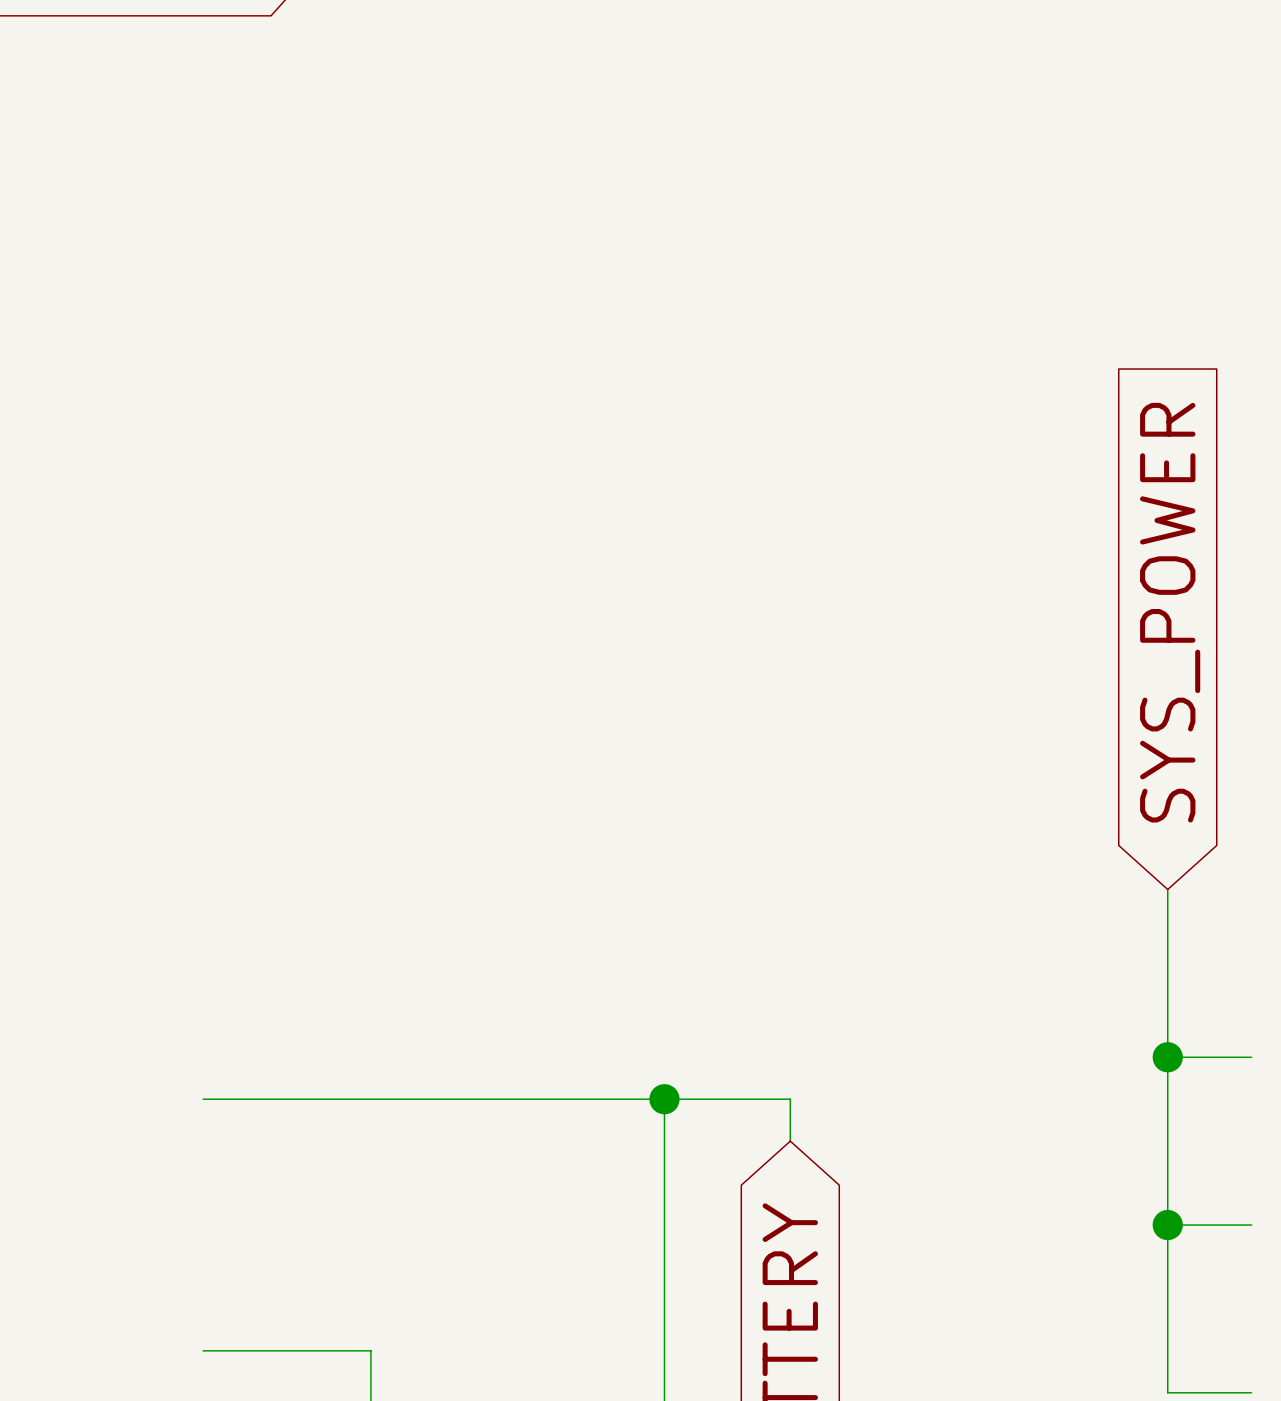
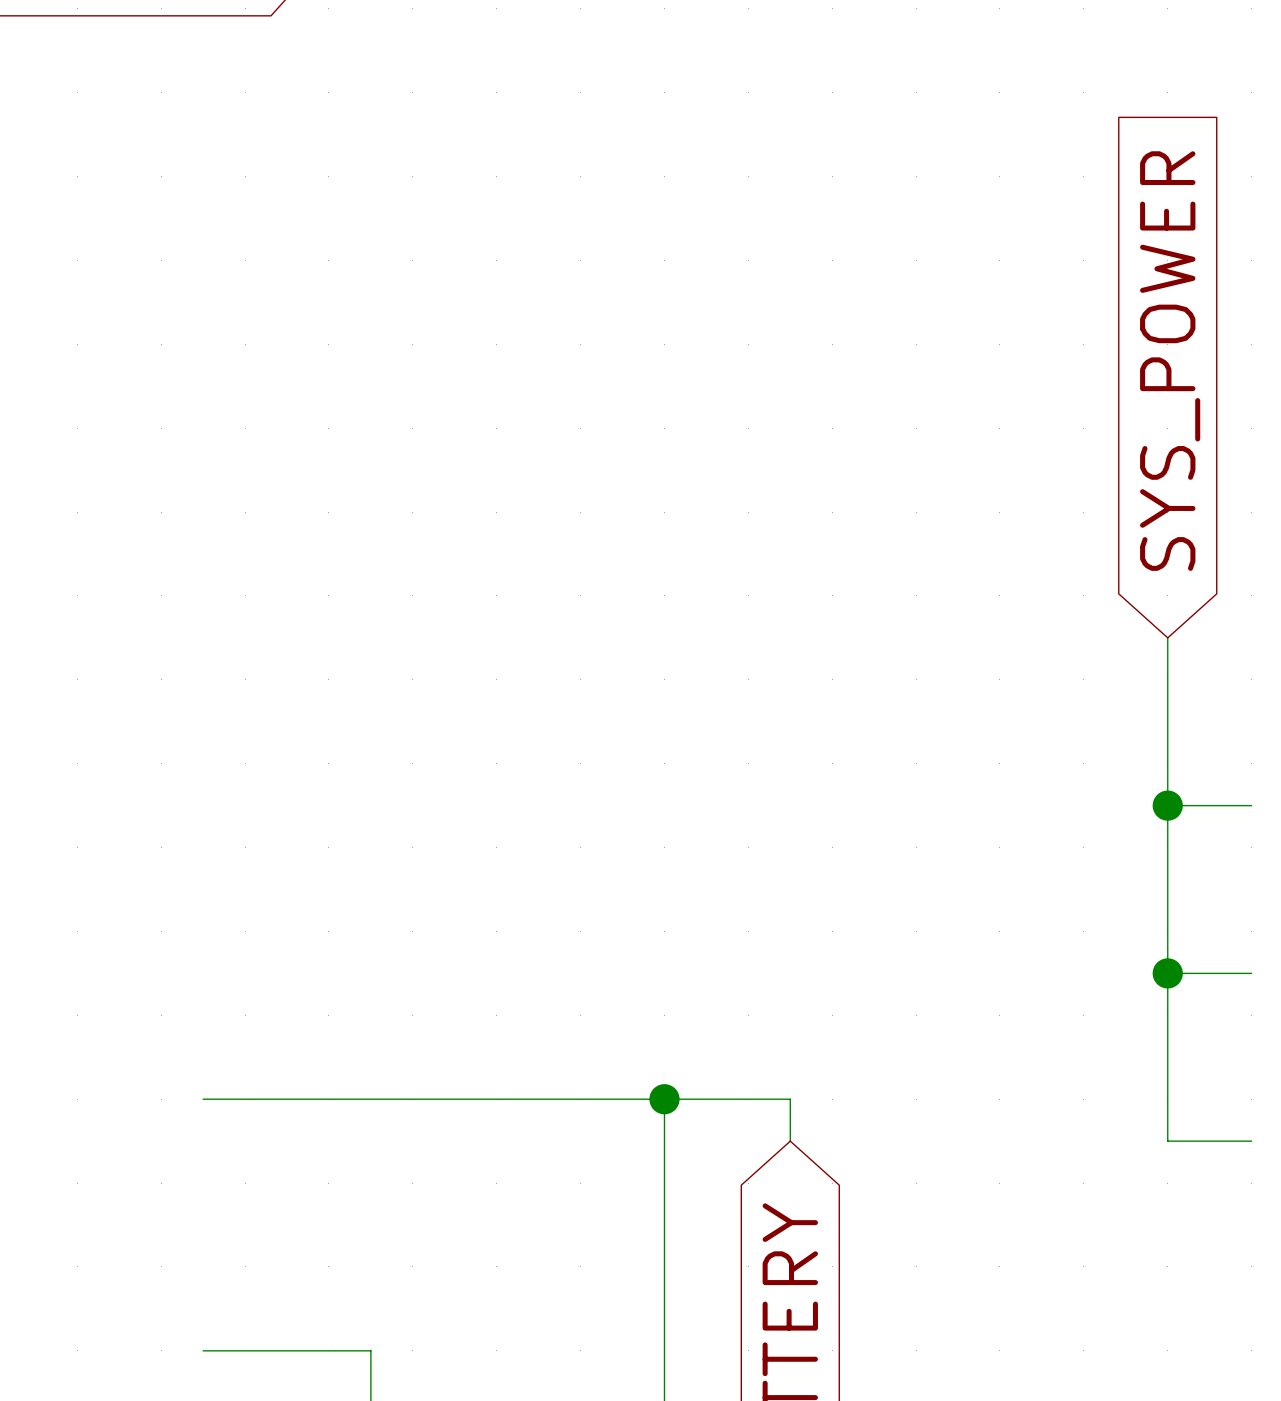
global label position: SYS_POWER (1170, 612) -> SYS_POWER (1170, 361)
wire: none -> (1167, 637) (1167, 889)
junction: none -> (1167, 805)
wire: (1167, 1057) (1251, 1057) -> (1167, 973) (1251, 973)
junction position: (1167, 1057) -> (1167, 973)
wire: (1167, 1141) (1167, 1392) (1251, 1392) -> (1167, 1141) (1251, 1141)
wire: (1167, 1225) (1251, 1225) -> (1167, 805) (1251, 805)
junction: (1167, 1225) -> none

